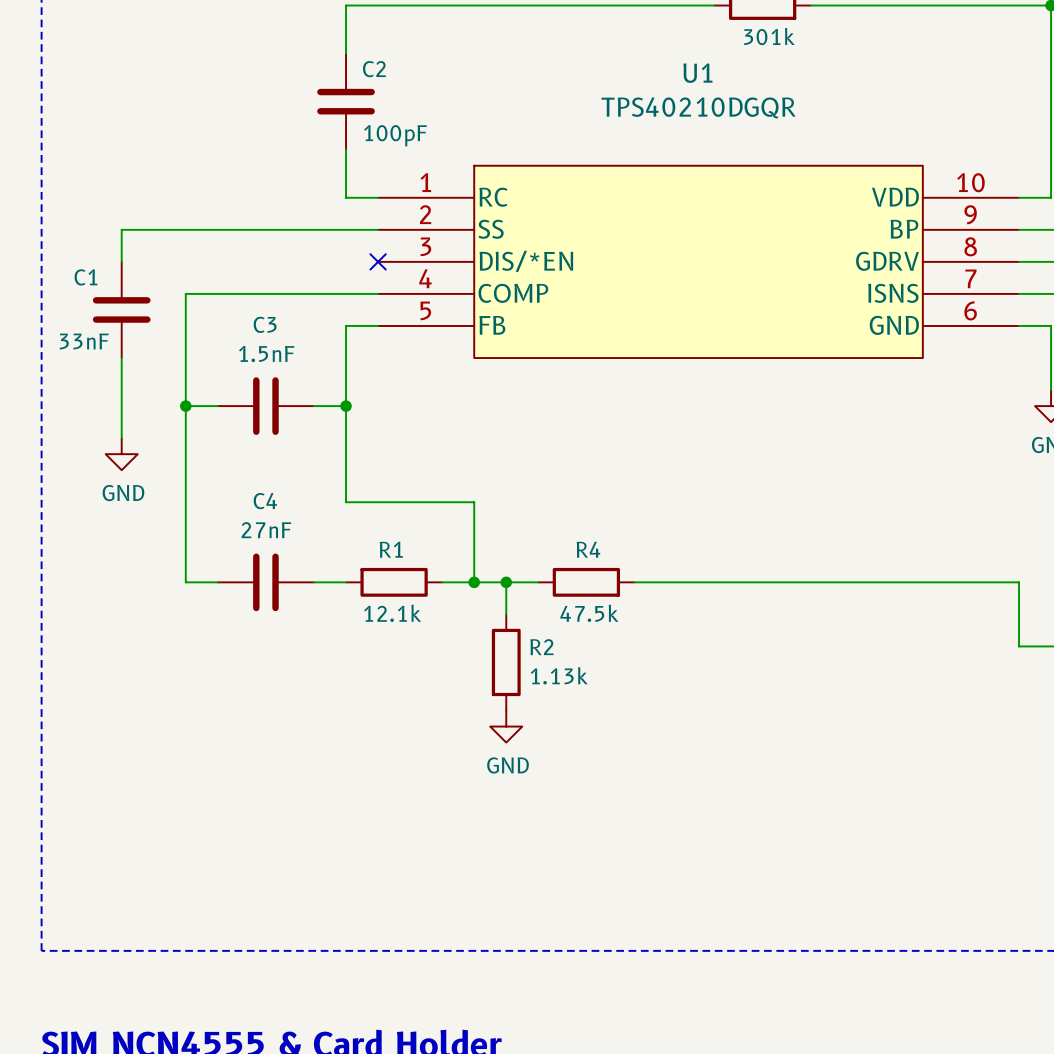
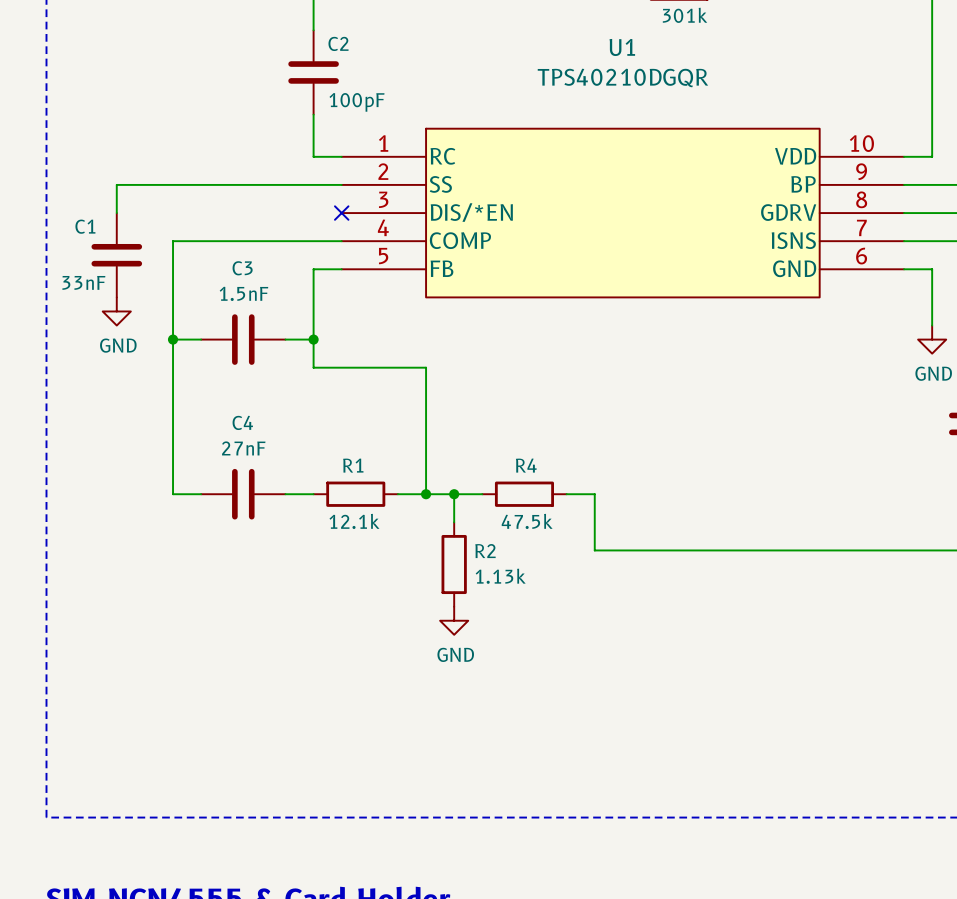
wire: (121, 358) (121, 438) -> none
wire: (346, 438) (346, 502) (474, 502) -> (313, 367) (426, 367) (426, 423)
power symbol position: GND (121, 454) -> GND (116, 311)
wire: (666, 582) (1019, 582) (1019, 646) -> (594, 494) (594, 550) (904, 550)

